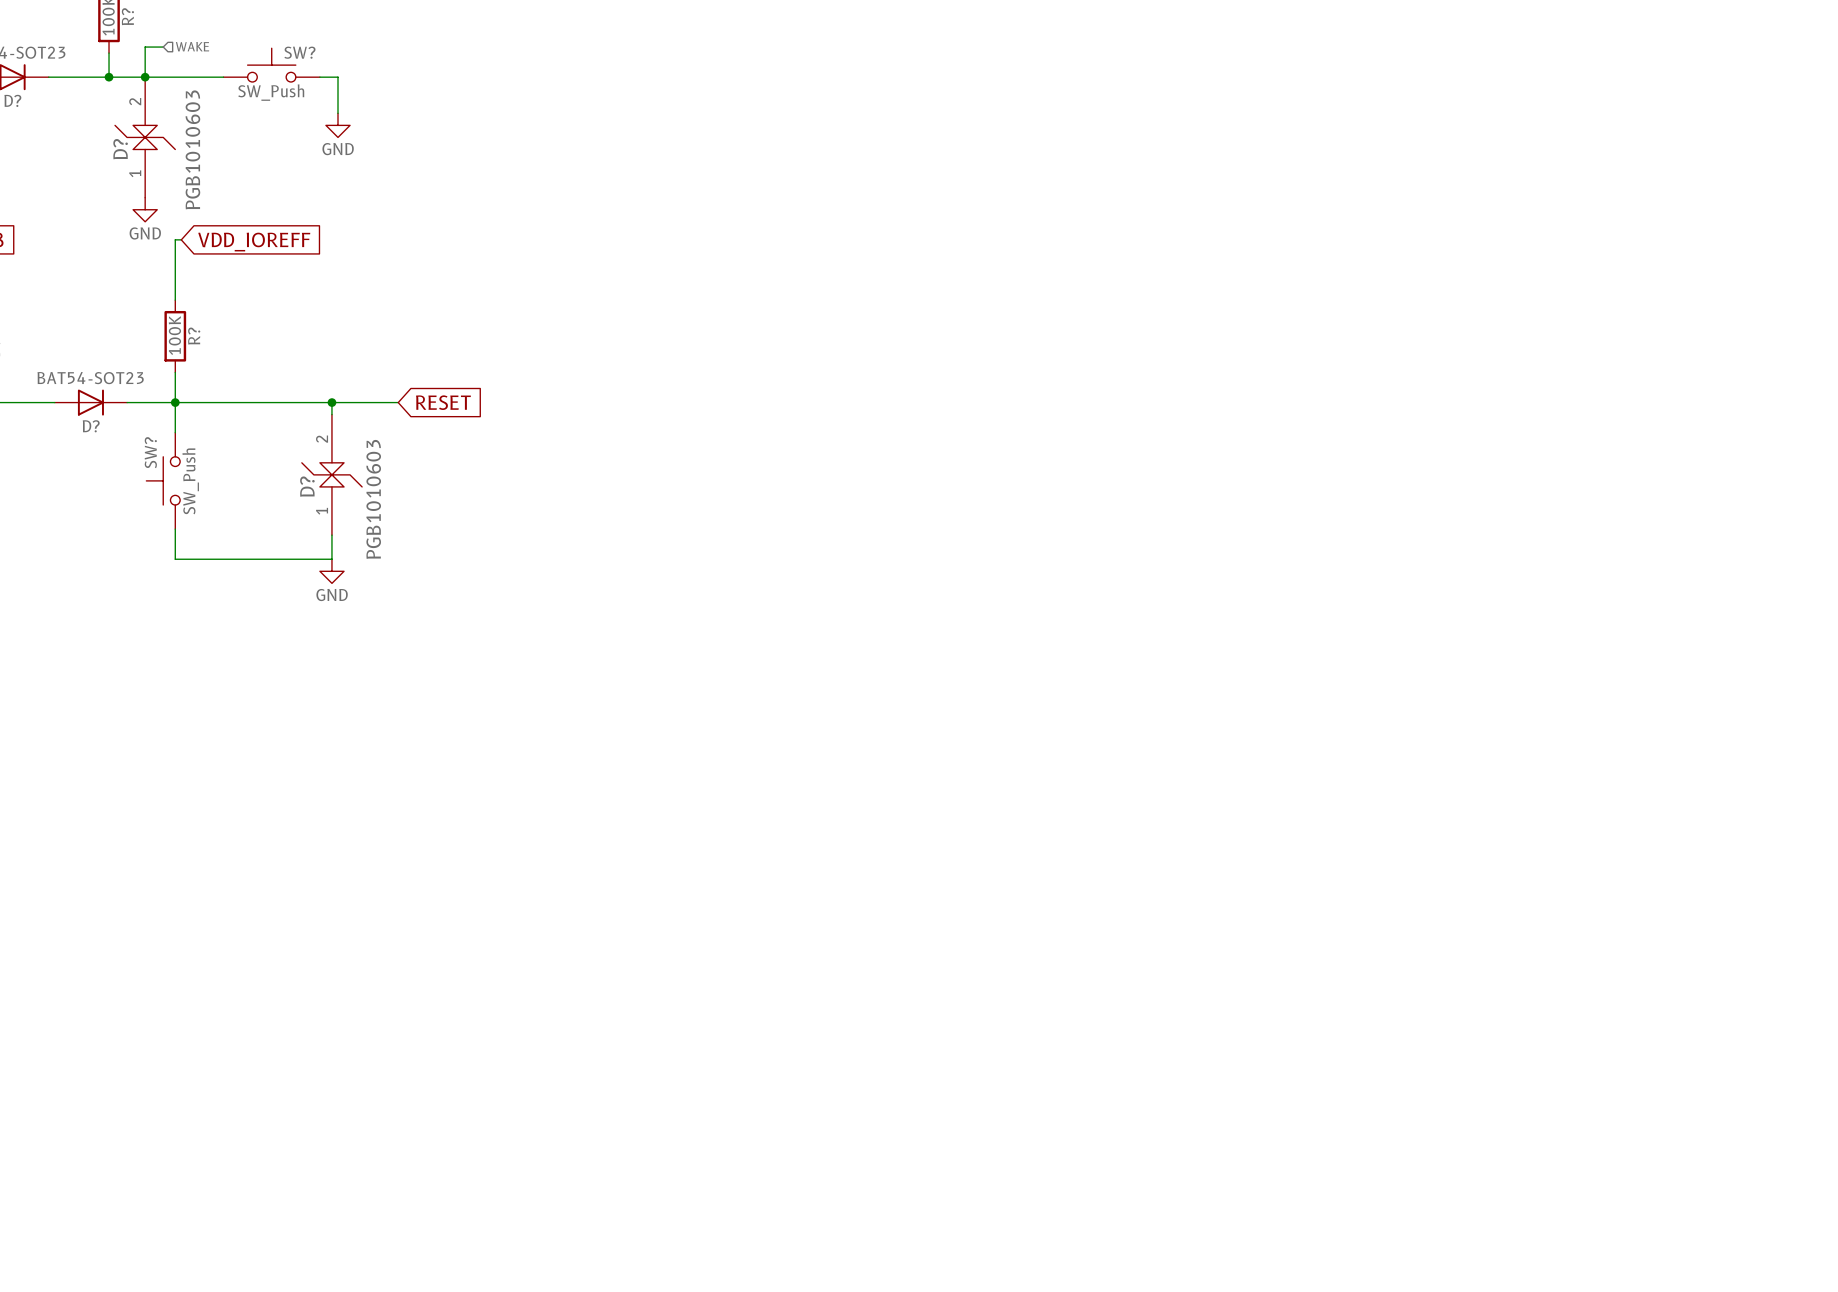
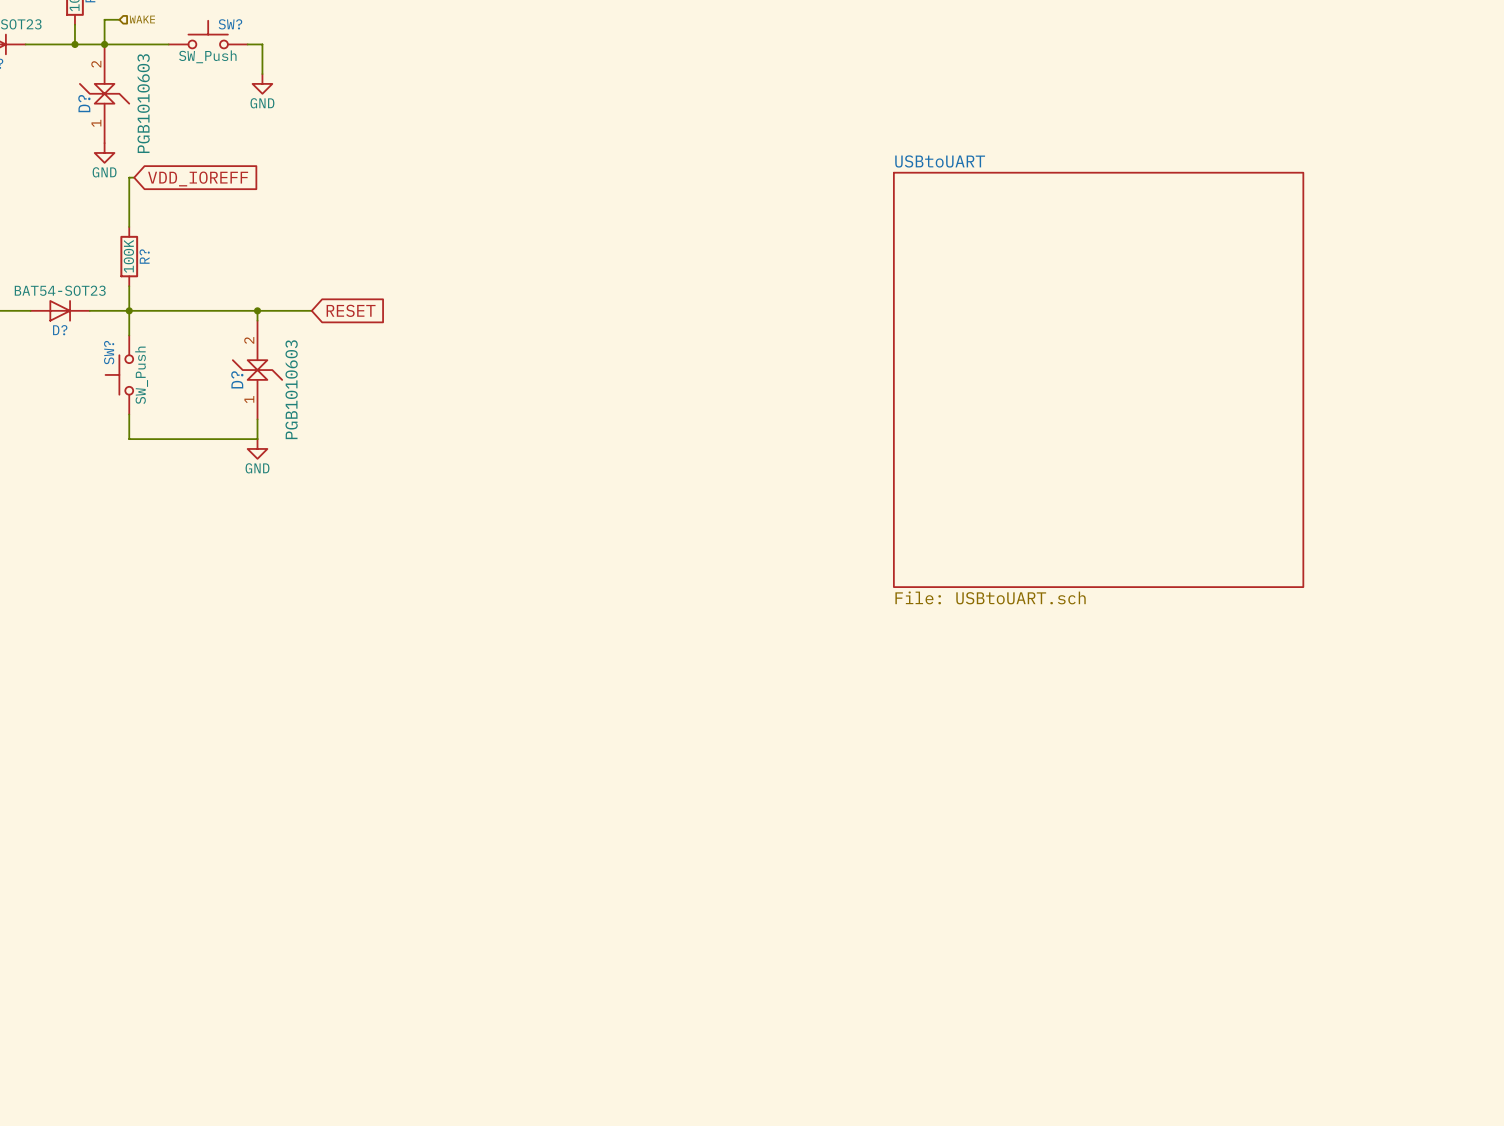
sheet USBtoUART: none -> File: USBtoUART.sch (1098, 379)

